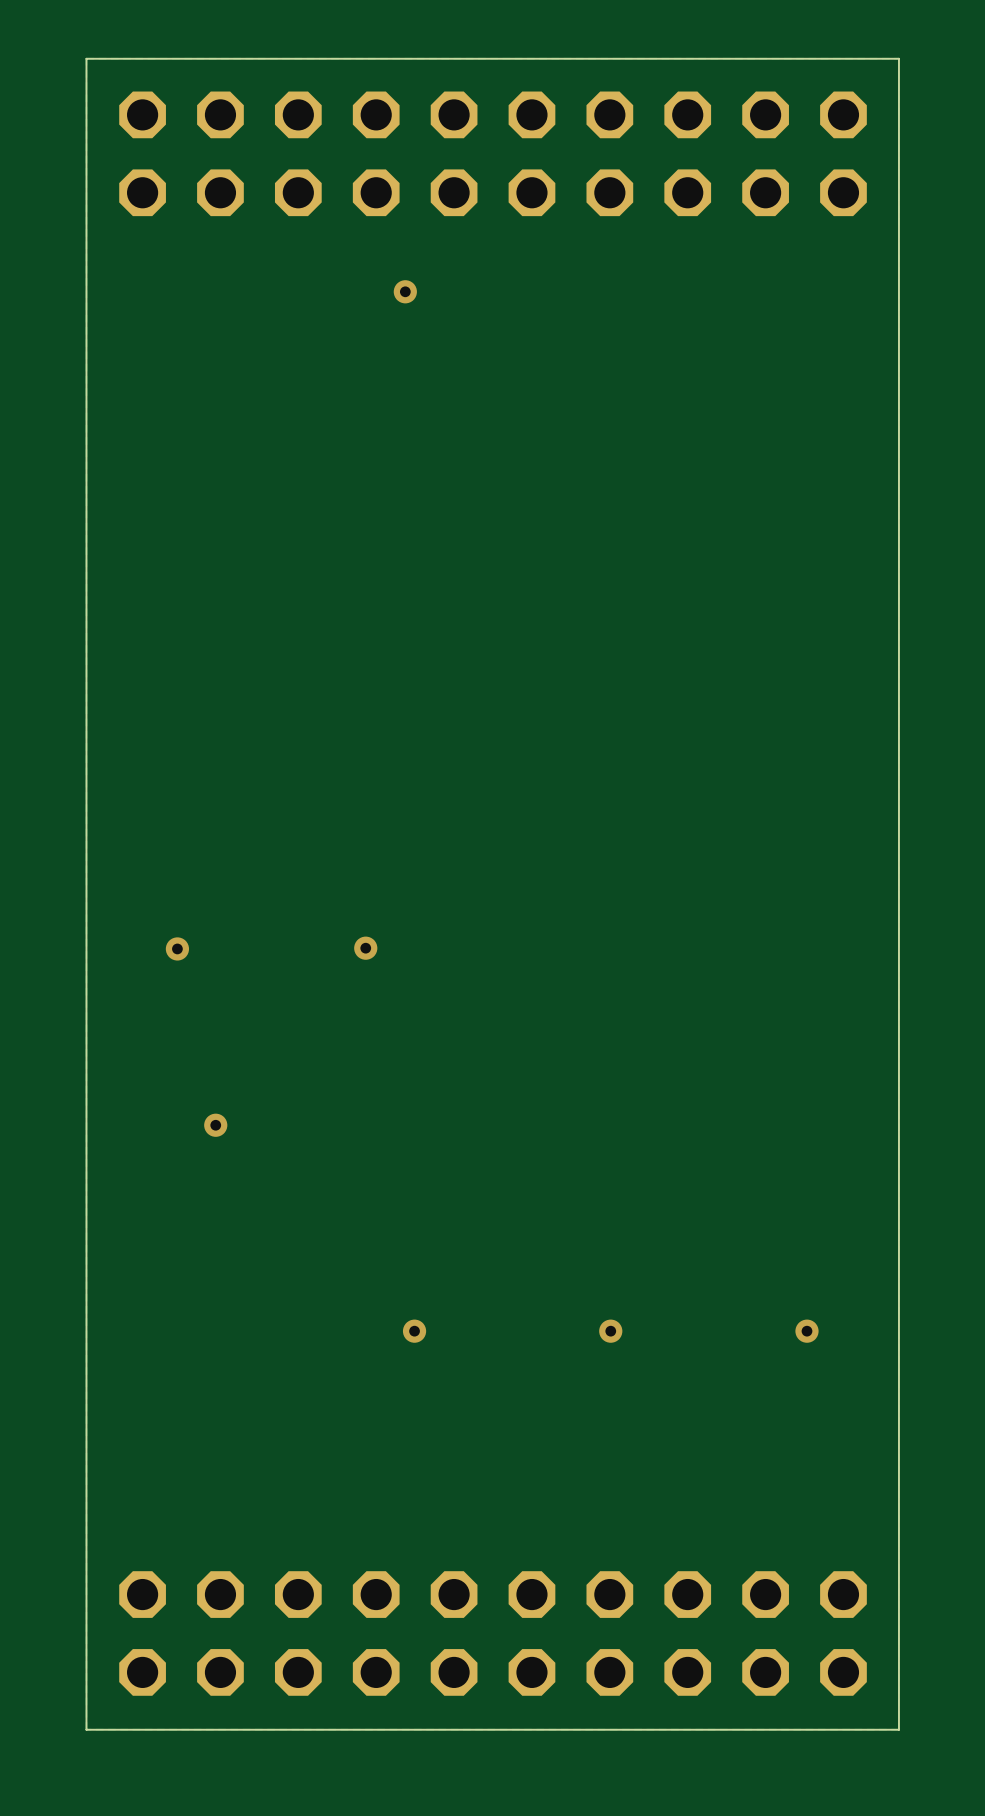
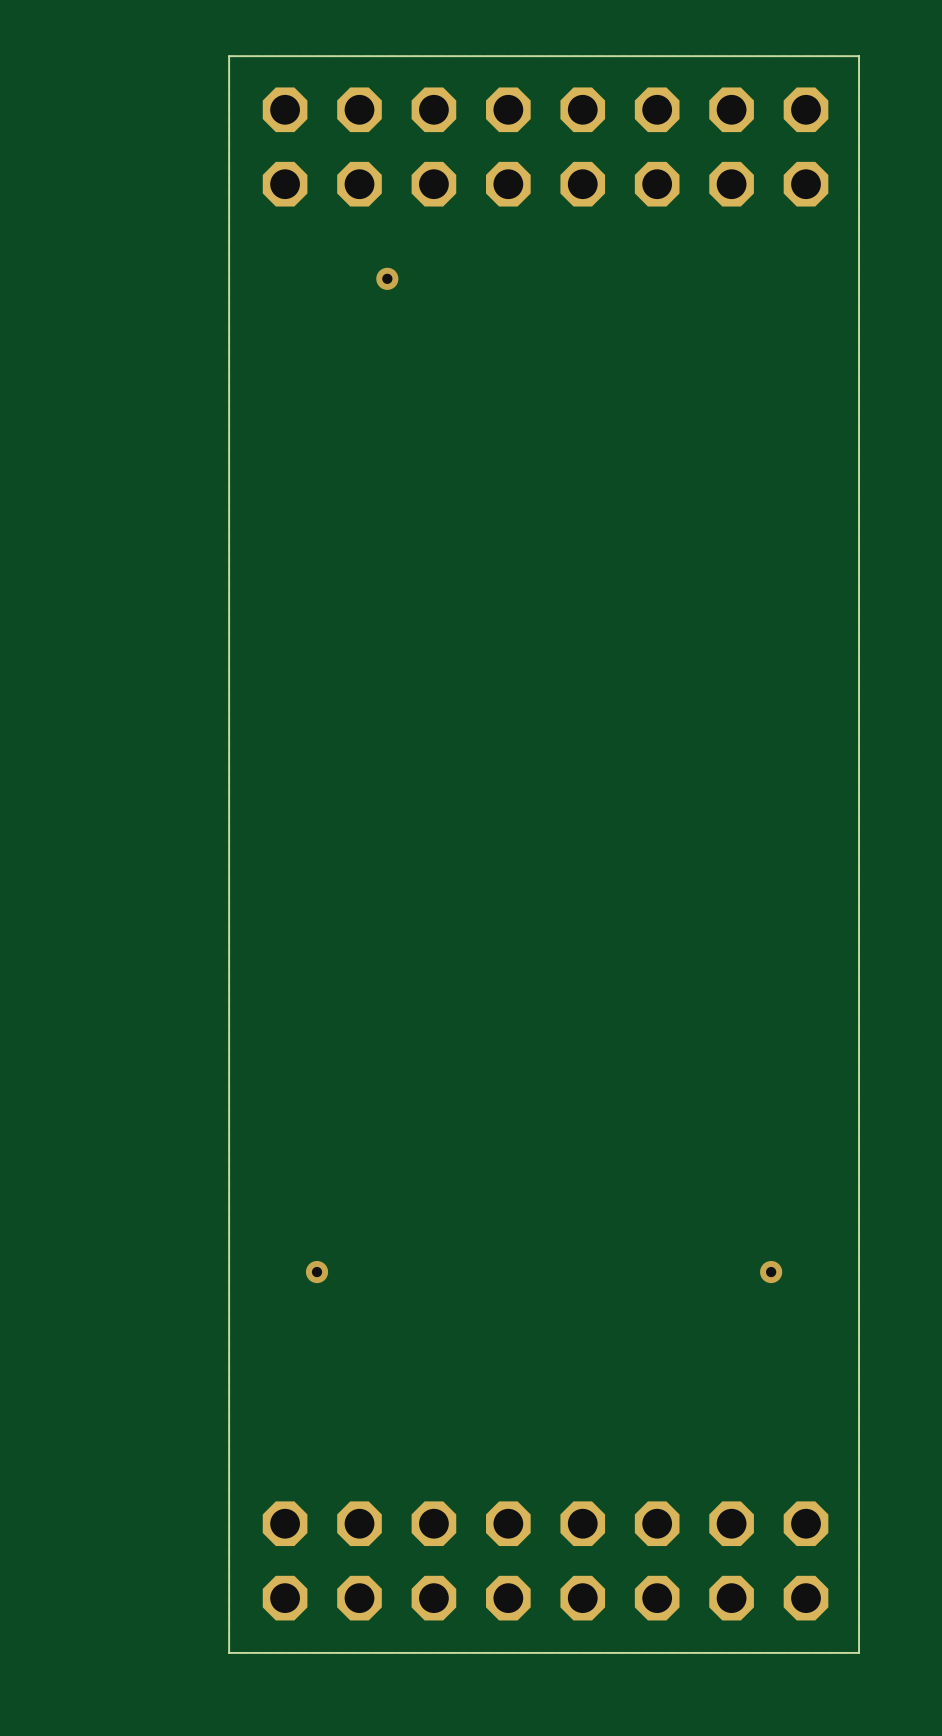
board edge: (239, 58) (86, 58) (86, 1729) (239, 1729) -> (229, 56) (229, 1652)
part: (493, 153) -> none
via: (177, 948) -> none
via: (365, 948) -> none
via: (215, 1125) -> none
via position: (414, 1331) -> (317, 1272)
via: (610, 1331) -> none
part: (493, 1633) -> none

